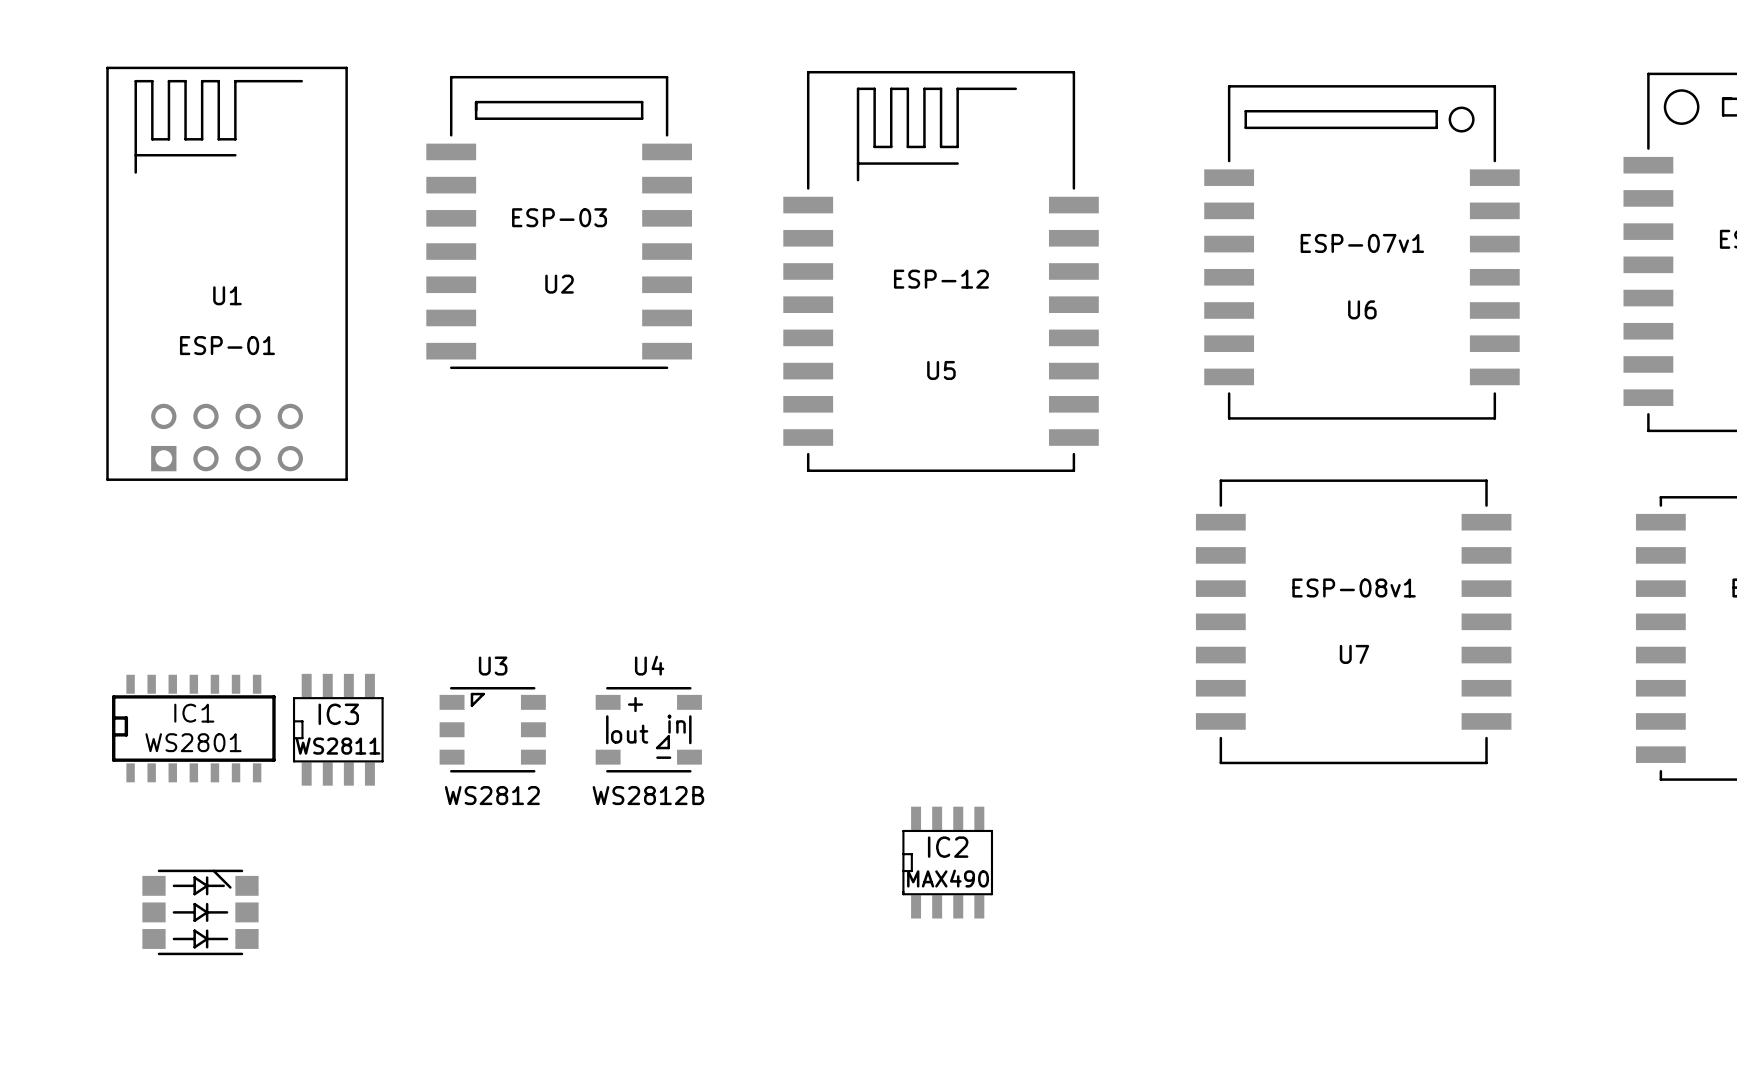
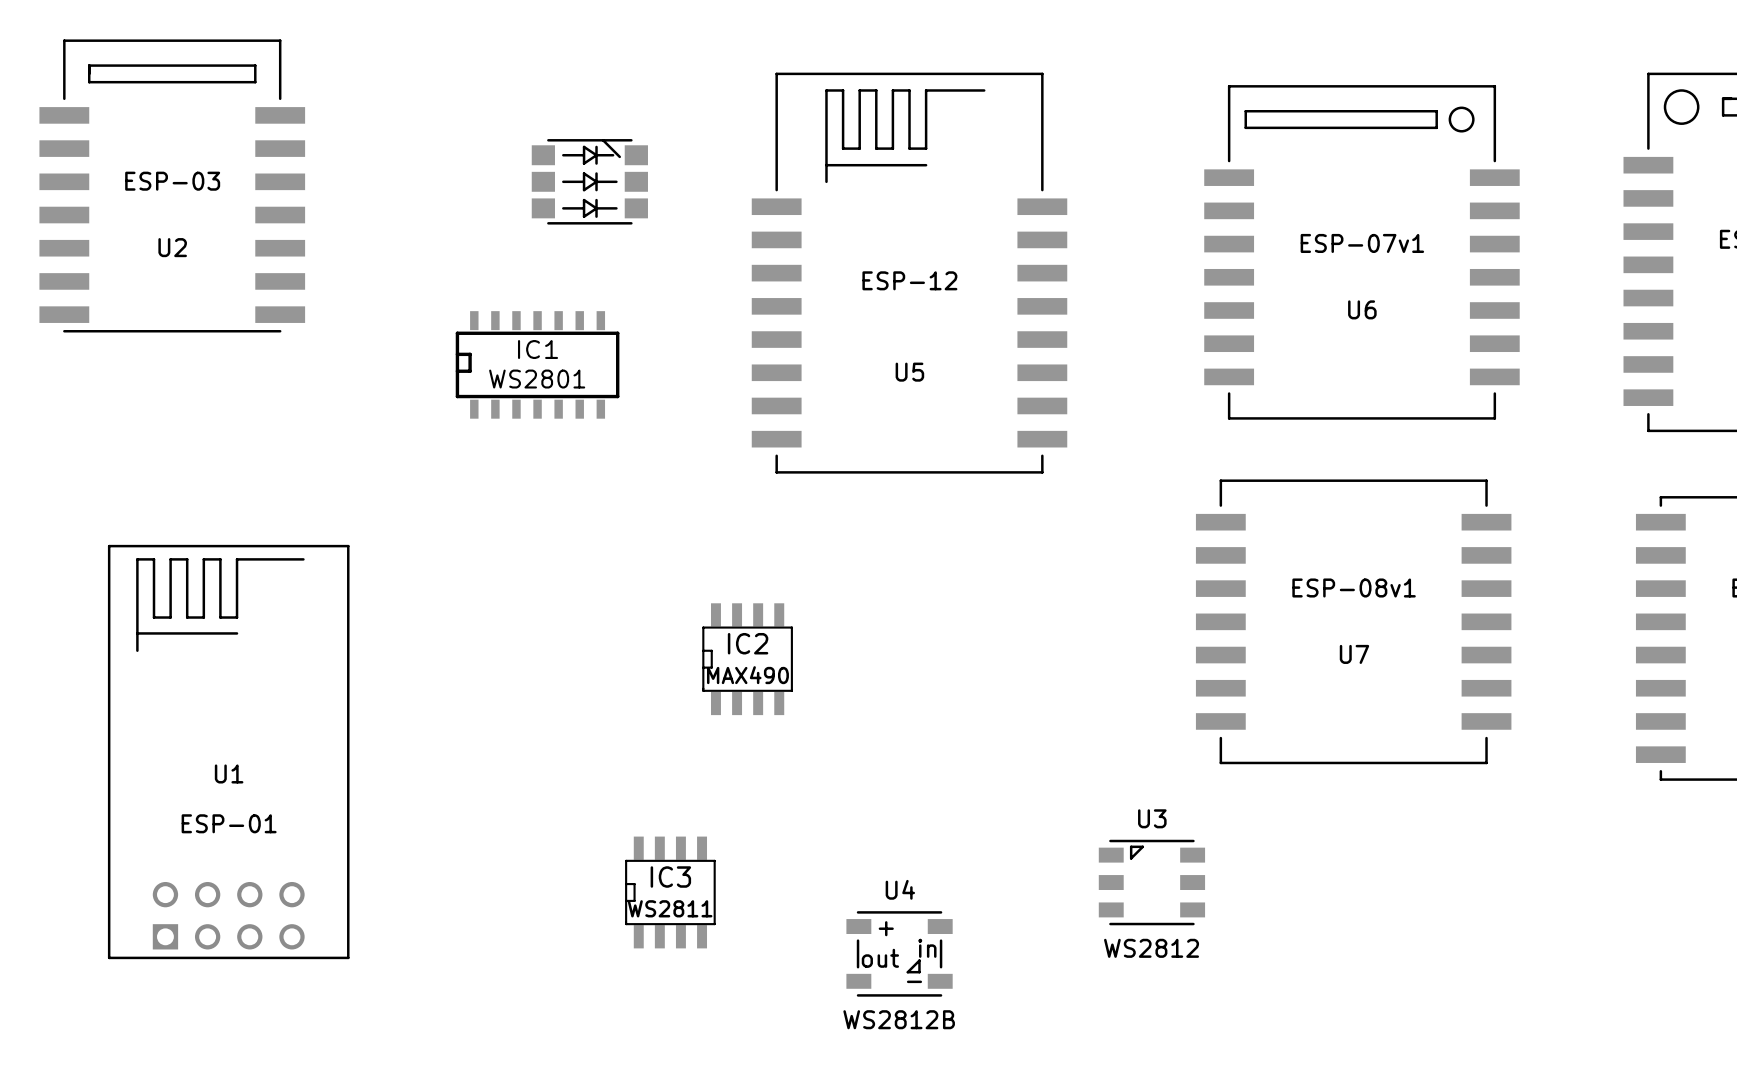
part: none -> (589, 181)
U2 position: (559, 222) -> (172, 185)
U5 position: (941, 271) -> (909, 273)
U1 position: (227, 273) -> (228, 752)
IC1 position: (193, 728) -> (537, 364)
IC3 position: (338, 729) -> (670, 892)
U3 position: (492, 729) -> (1151, 882)
U4 position: (648, 729) -> (899, 953)
IC2 position: (947, 862) -> (747, 659)
part: (200, 912) -> none

